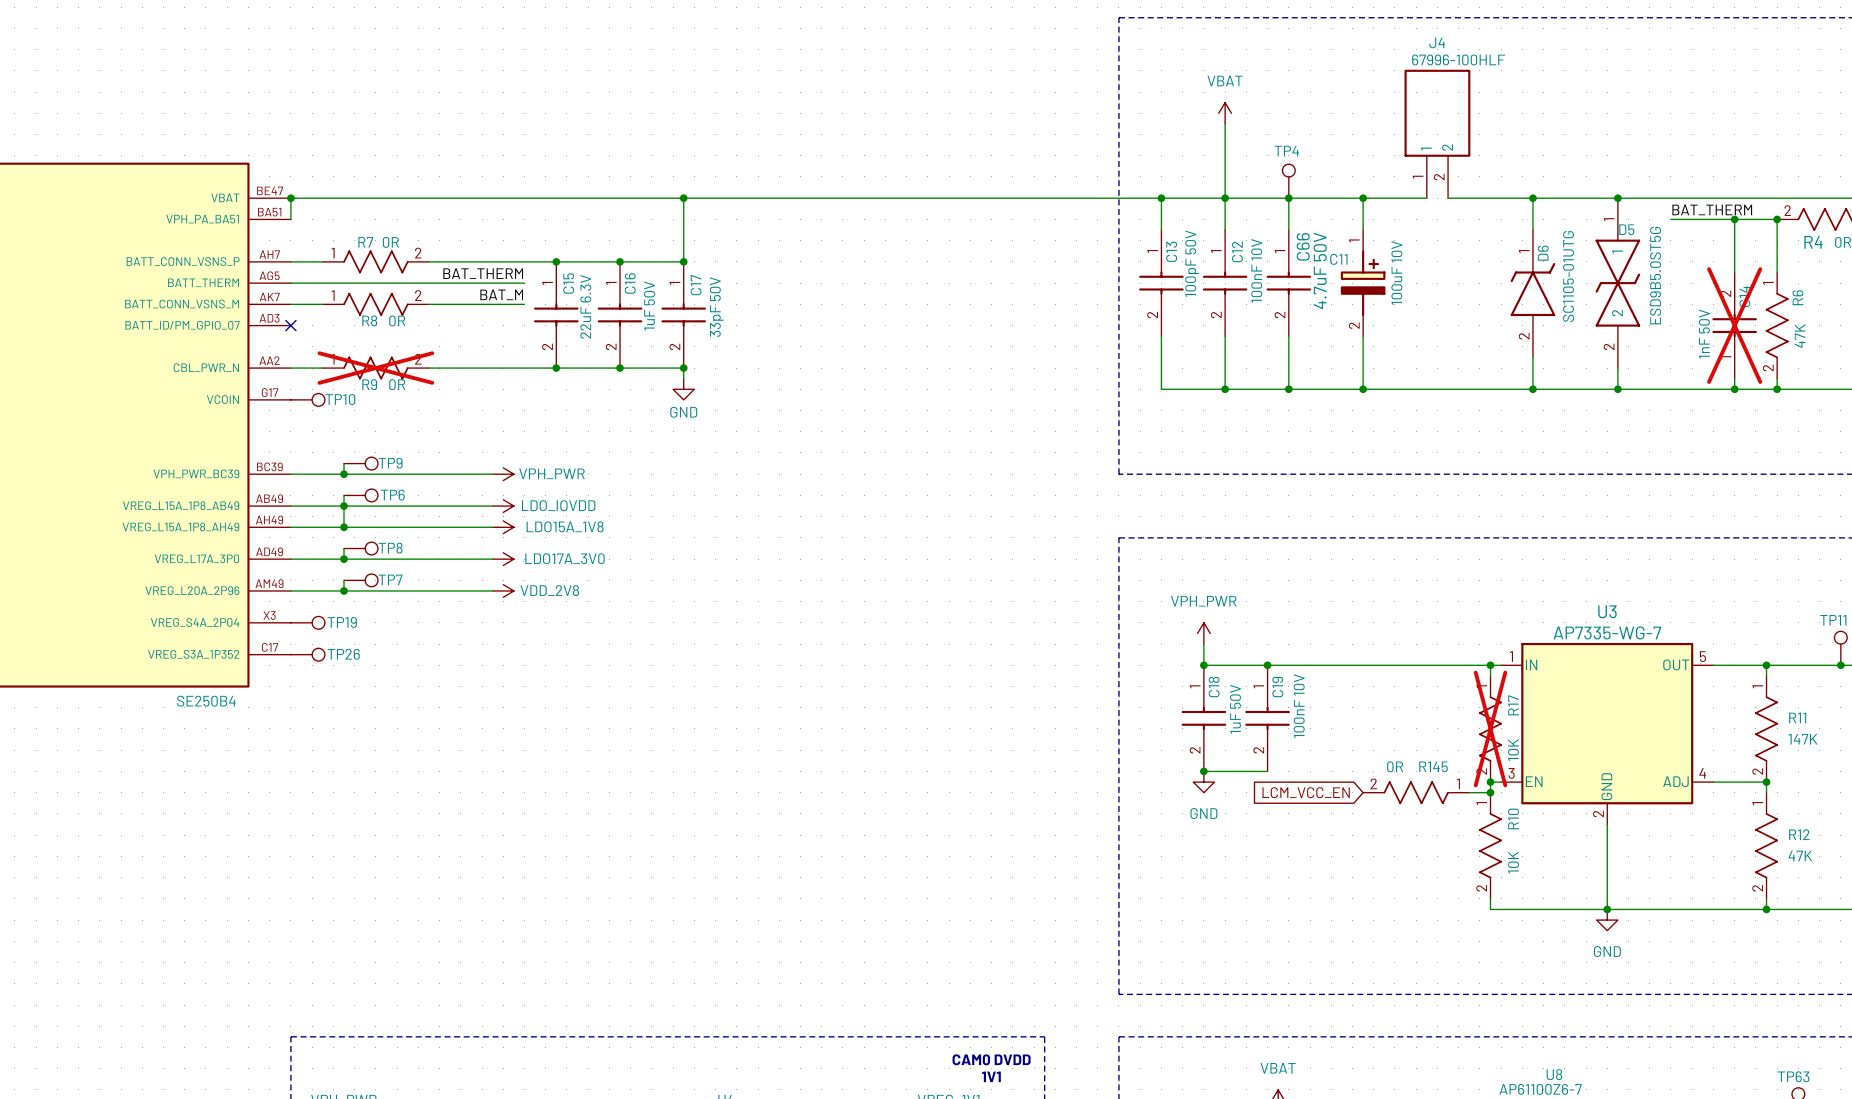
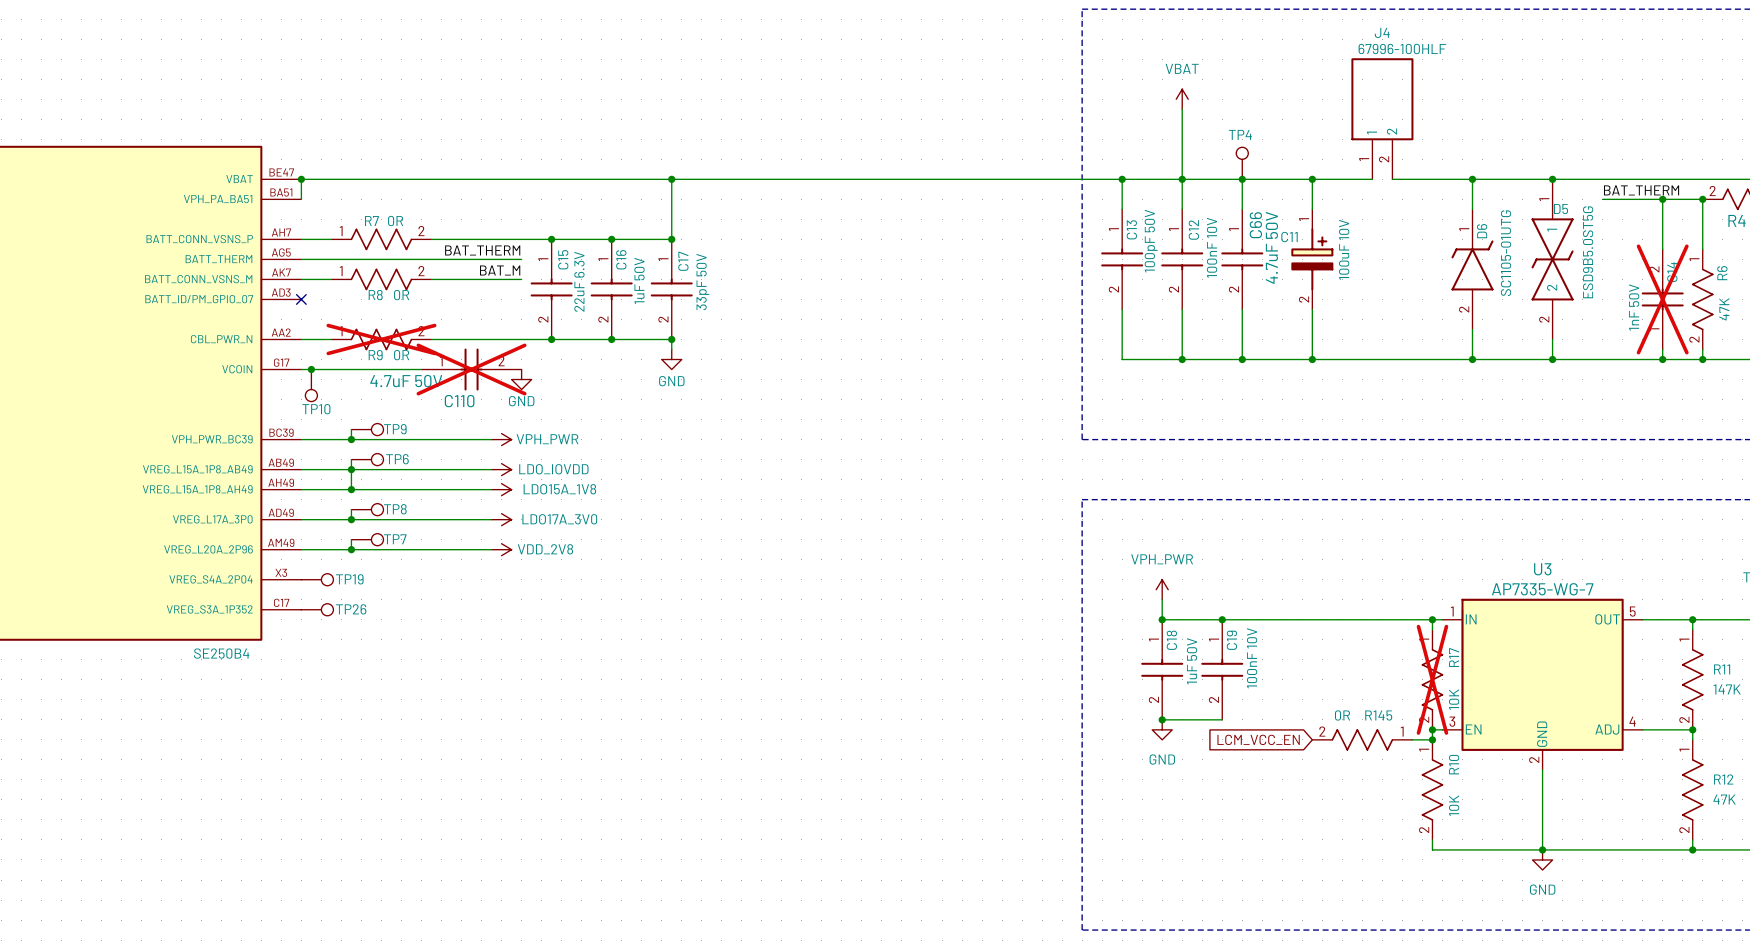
wire: none -> (301, 369) (421, 369)
junction: none -> (311, 369)
TP10 rotation: 0° (318, 399) -> 90° clockwise (311, 395)
C110: none -> 4.7uF 50V (471, 369)
power symbol: none -> GND (521, 379)

